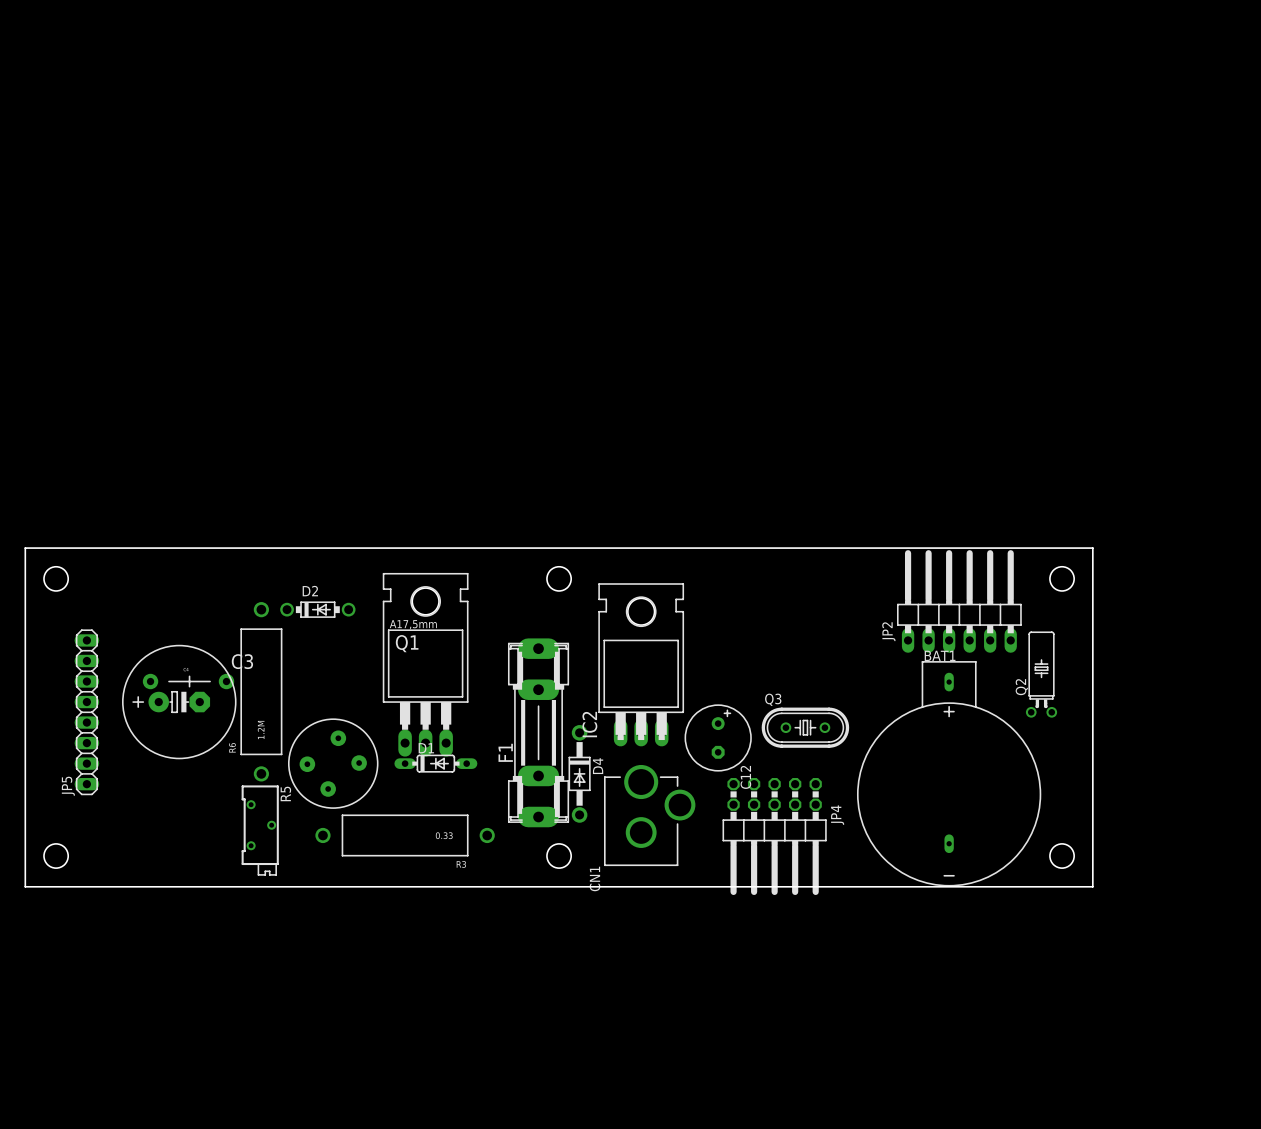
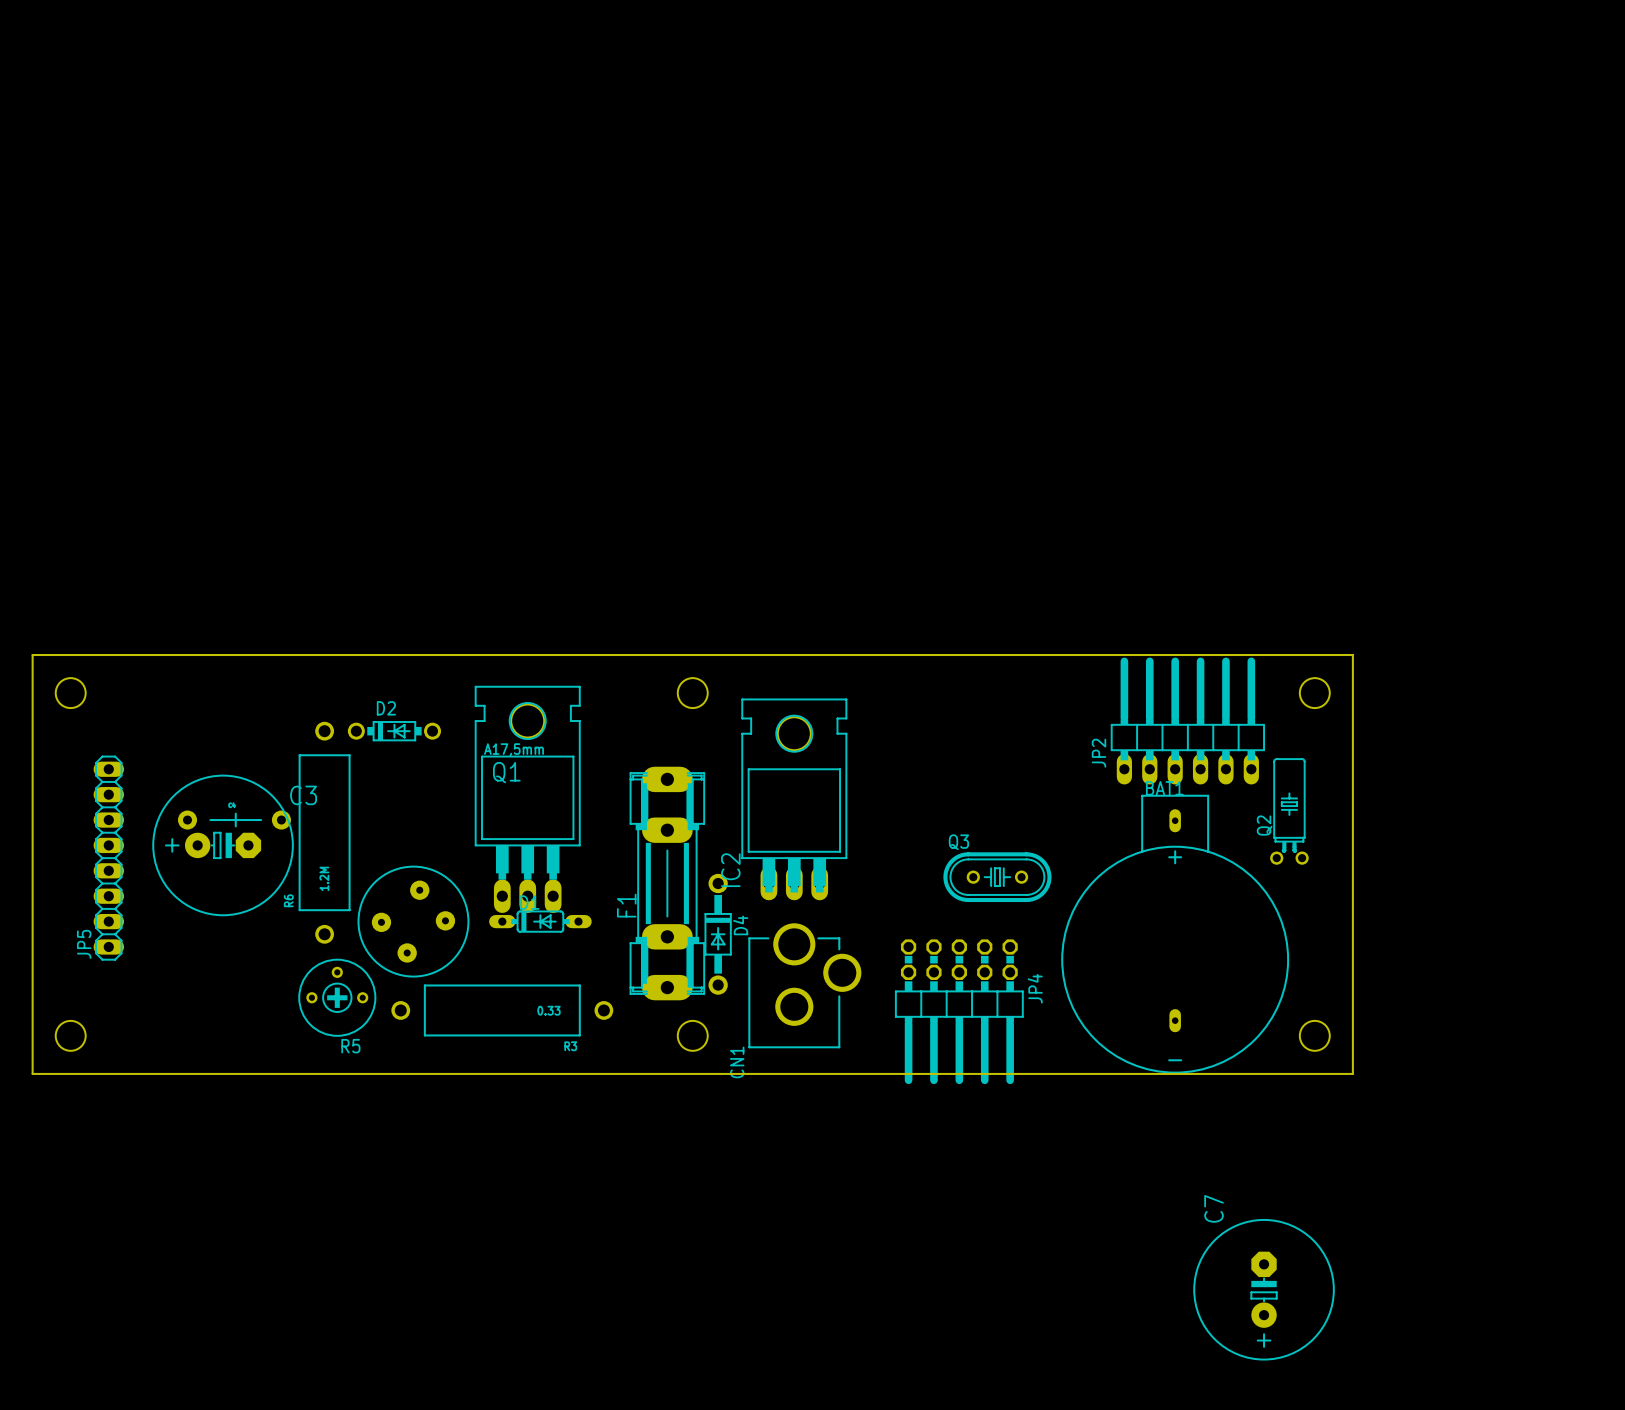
C12: (718, 737) -> none
R5 footprint: [241, 785, 279, 876] -> [298, 958, 377, 1037]
R5 name position: R5 (285, 793) -> R5 (350, 1046)
C7: none -> (1264, 1289)

